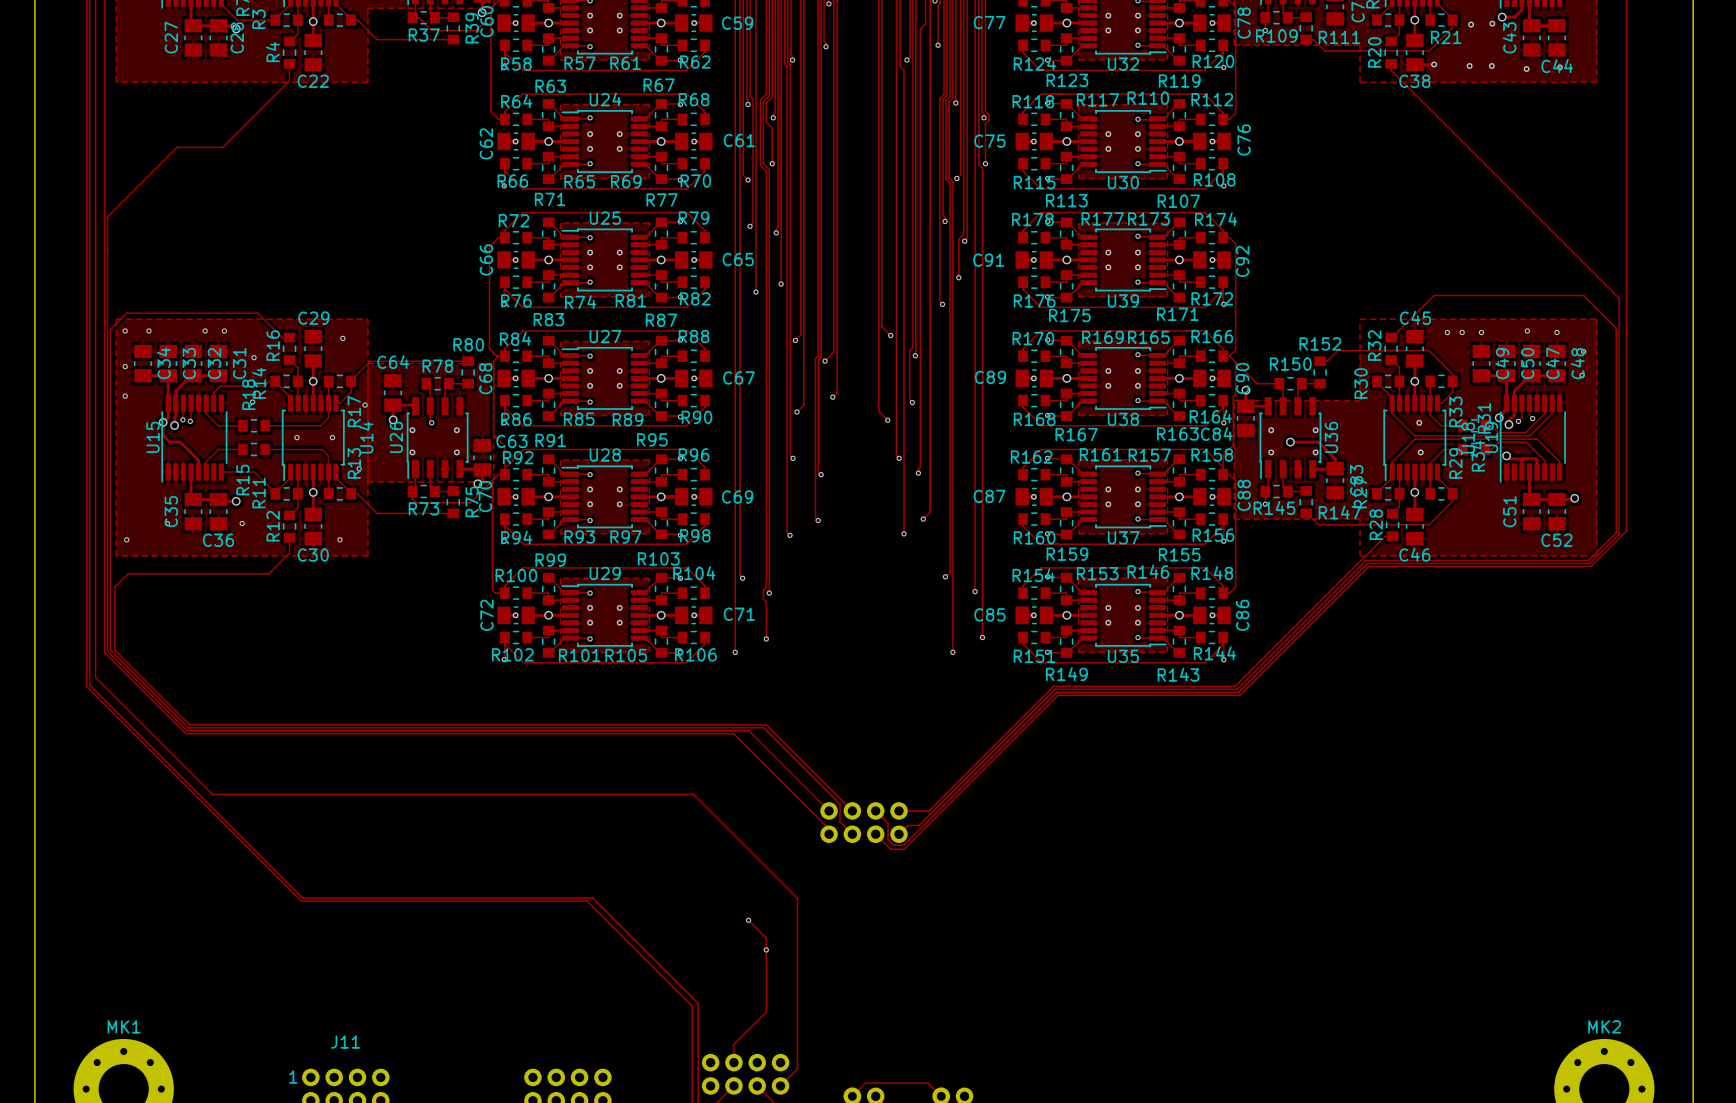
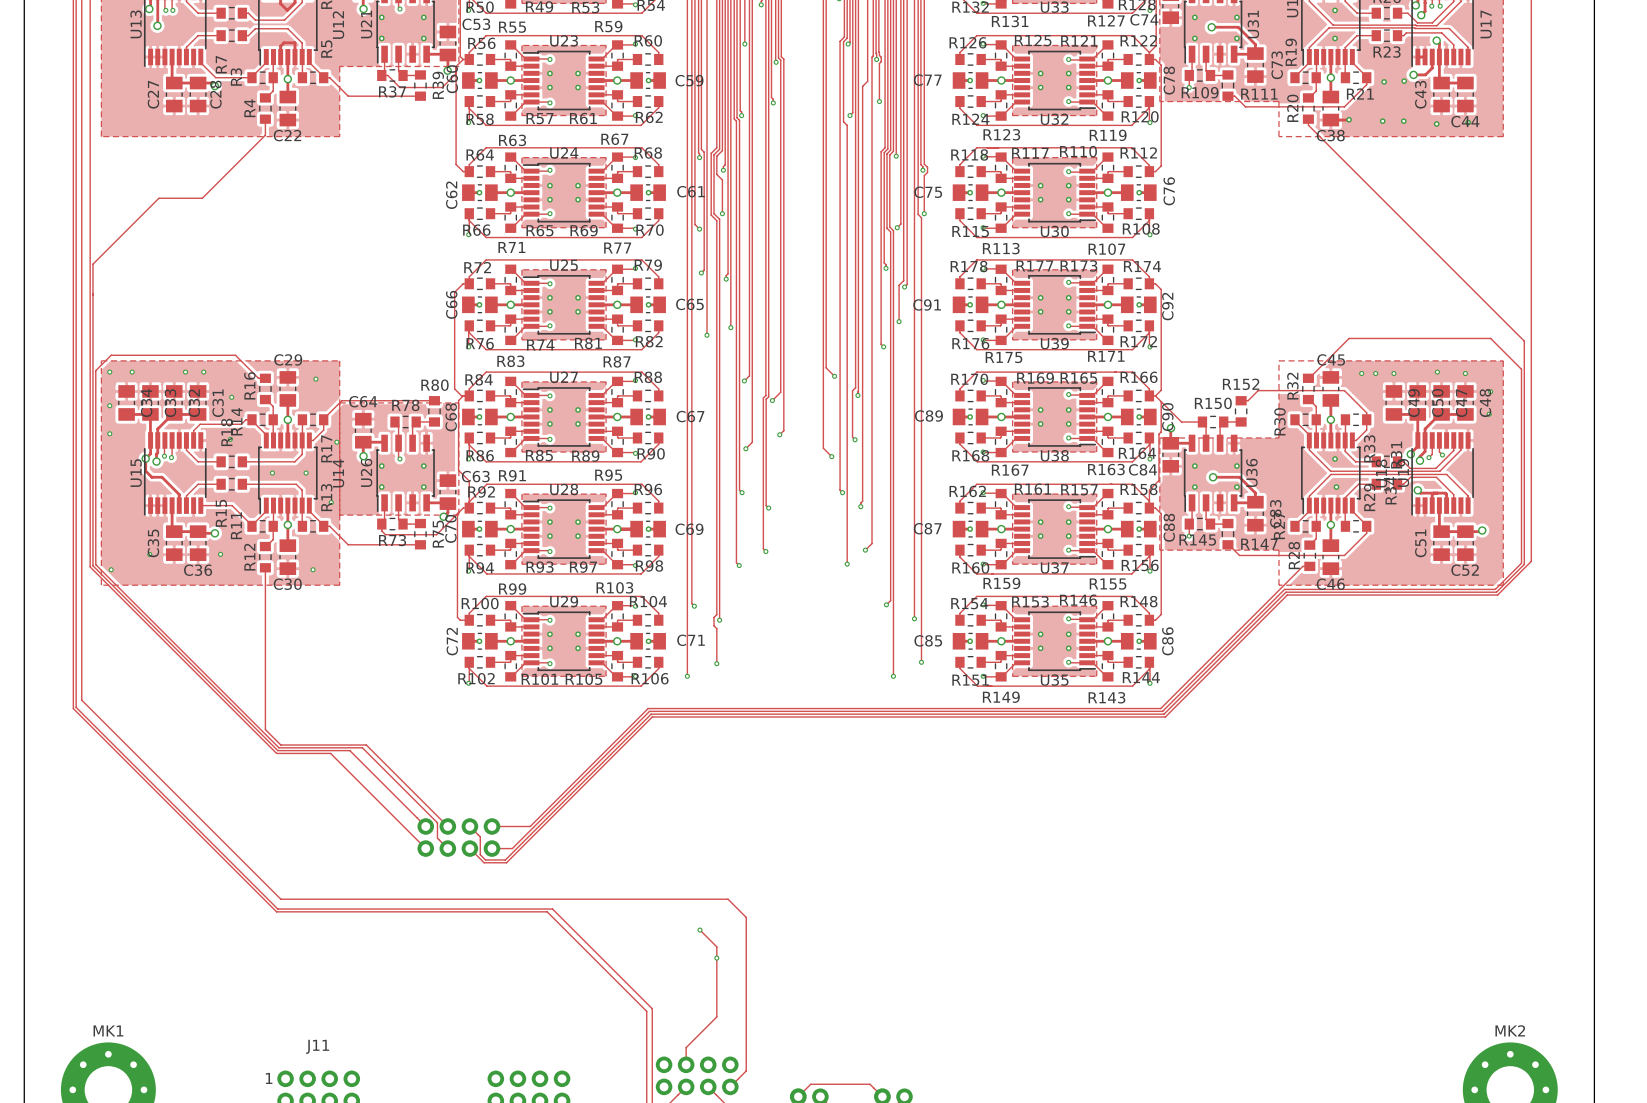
track: (110, 534) (110, 649) (188, 727) (303, 727) -> (95, 564) (278, 747)
track: (107, 535) (107, 651) (187, 730) (302, 730) -> (92, 565) (277, 750)
track: (104, 536) (104, 652) (185, 733) (301, 733) -> (90, 566) (276, 753)
track: (289, 553) (268, 573) (128, 573) (114, 587) (114, 650) (189, 724) (305, 724) -> (265, 582) (265, 729) (280, 745)
track: (1053, 686) (929, 810) (899, 810) -> (988, 708) (648, 708) (530, 826) (491, 826)
track: (1055, 689) (918, 825) (907, 825) (899, 834) -> (990, 711) (649, 711) (512, 848) (491, 848)
track: (1056, 692) (903, 845) (893, 845) (888, 839) (888, 823) (875, 810) -> (991, 714) (651, 714) (505, 859) (485, 859) (480, 854) (480, 836) (469, 826)
track: (1058, 695) (904, 849) (890, 849) (875, 834) -> (992, 716) (652, 716) (506, 862) (484, 862) (469, 848)
track: (396, 724) (766, 724) (852, 810) -> (366, 745) (447, 826)
track: (392, 727) (763, 727) (840, 804) (840, 821) (852, 834) -> (362, 747) (437, 822) (437, 838) (447, 848)
track: (378, 730) (748, 730) (829, 810) -> (349, 750) (425, 826)
track: (358, 733) (733, 733) (829, 829) (829, 834) -> (330, 753) (425, 848)
track: (212, 794) (693, 794) (797, 898) (797, 906) -> (192, 810) (280, 899) (728, 899) (746, 917)
part: none -> (458, 837)
part: (864, 822) -> none

